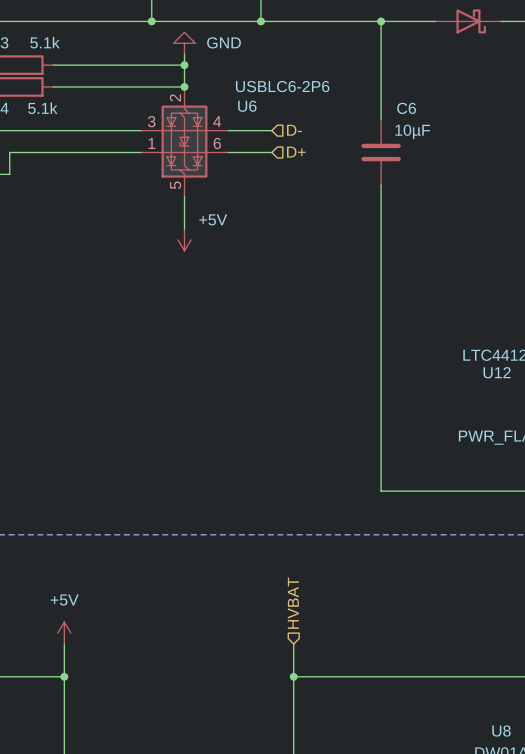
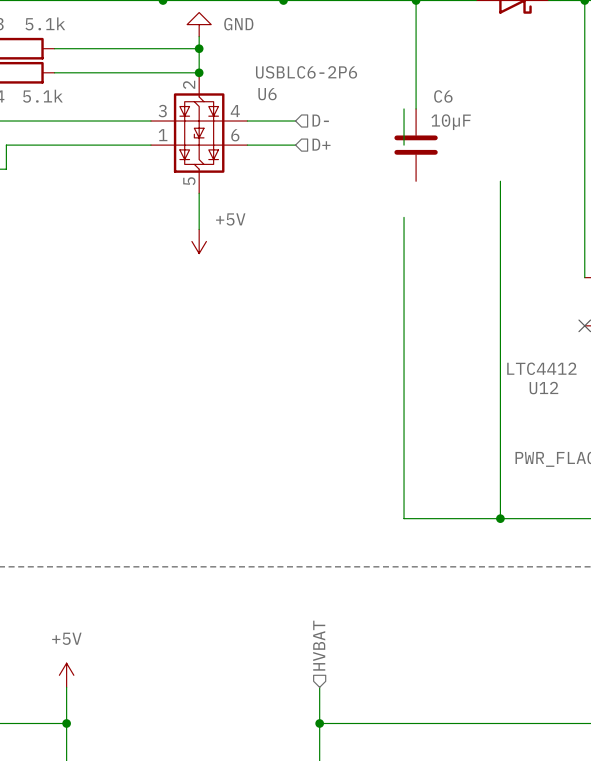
wire: none -> (404, 108) (404, 145)
wire: (381, 185) (381, 491) -> (404, 217) (404, 518) (416, 518)
wire: none -> (500, 181) (500, 518)
junction: none -> (500, 518)

